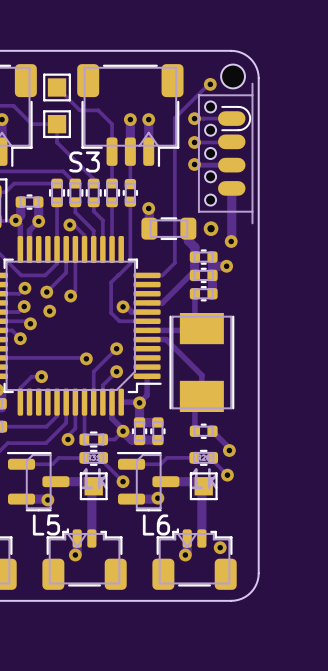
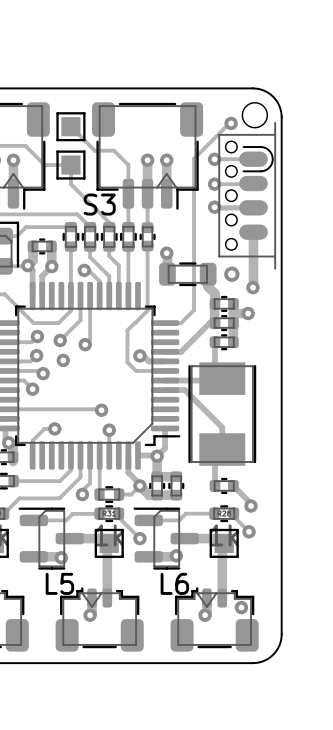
track: (116, 348) (93, 371) (93, 377) -> none
via: (116, 348) -> none
track: (116, 371) (102, 385) (102, 402) -> none
via: (116, 371) -> none
via: none -> (109, 430)

